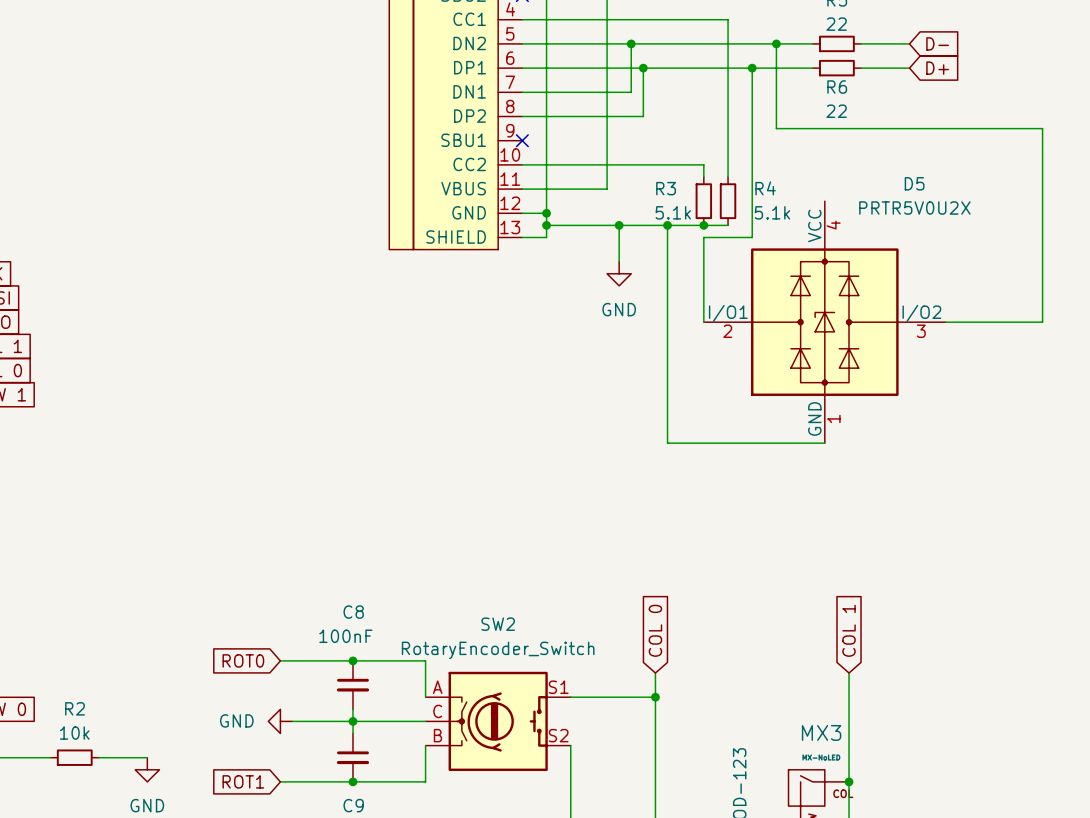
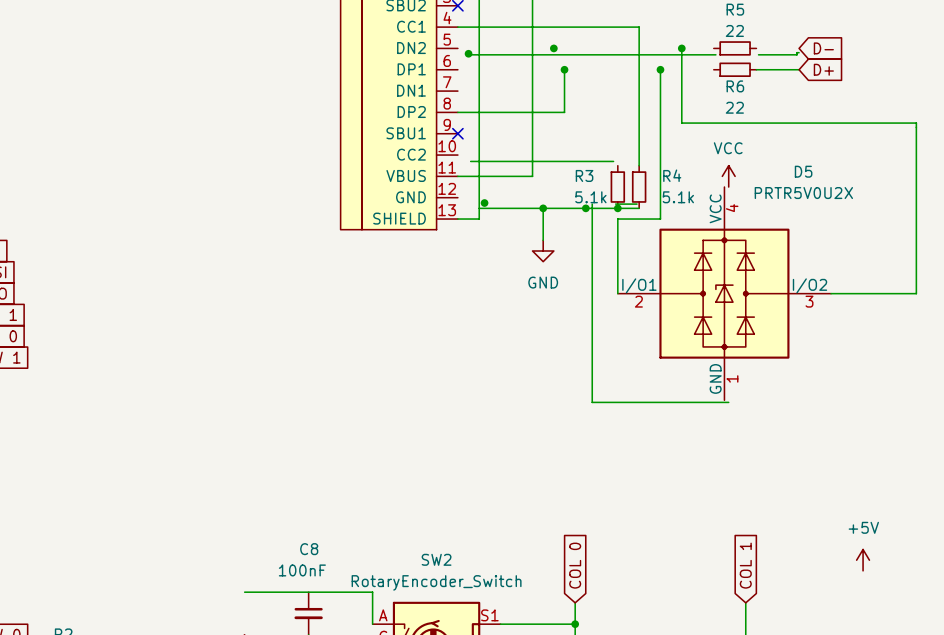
wire: (522, 43) (812, 43) -> none
wire: (631, 43) (631, 92) (522, 92) -> none
wire: (861, 43) (909, 43) -> none
wire: none -> (468, 52) (468, 54) (715, 54)
wire: none -> (799, 52) (796, 52) (796, 54) (758, 54)
junction: none -> (468, 53)
wire: (522, 68) (812, 68) -> none
wire: (522, 164) (703, 164) (703, 177) -> none
wire: none -> (470, 161) (613, 161)
power symbol: none -> VCC (728, 176)
wire: (522, 213) (546, 213) -> (615, 204) (637, 204)
junction: (546, 213) -> none
junction: none -> (484, 203)
wire: none -> (592, 204) (592, 402) (728, 402)
junction: (546, 225) -> none
wire: (667, 225) (667, 443) (824, 443) -> none
power symbol: none -> +5V (863, 560)
global label: ROT0 (243, 660) -> none
junction: (352, 660) -> none

